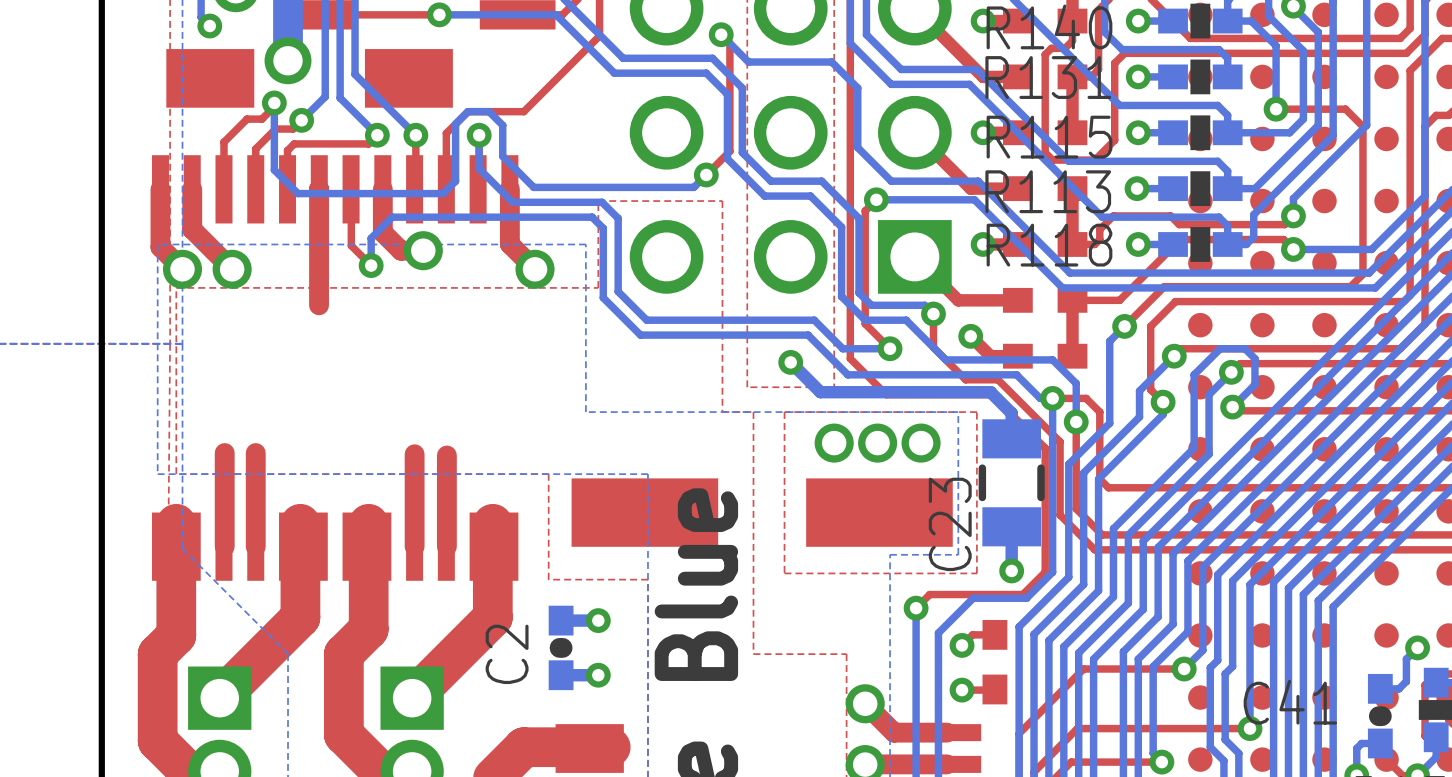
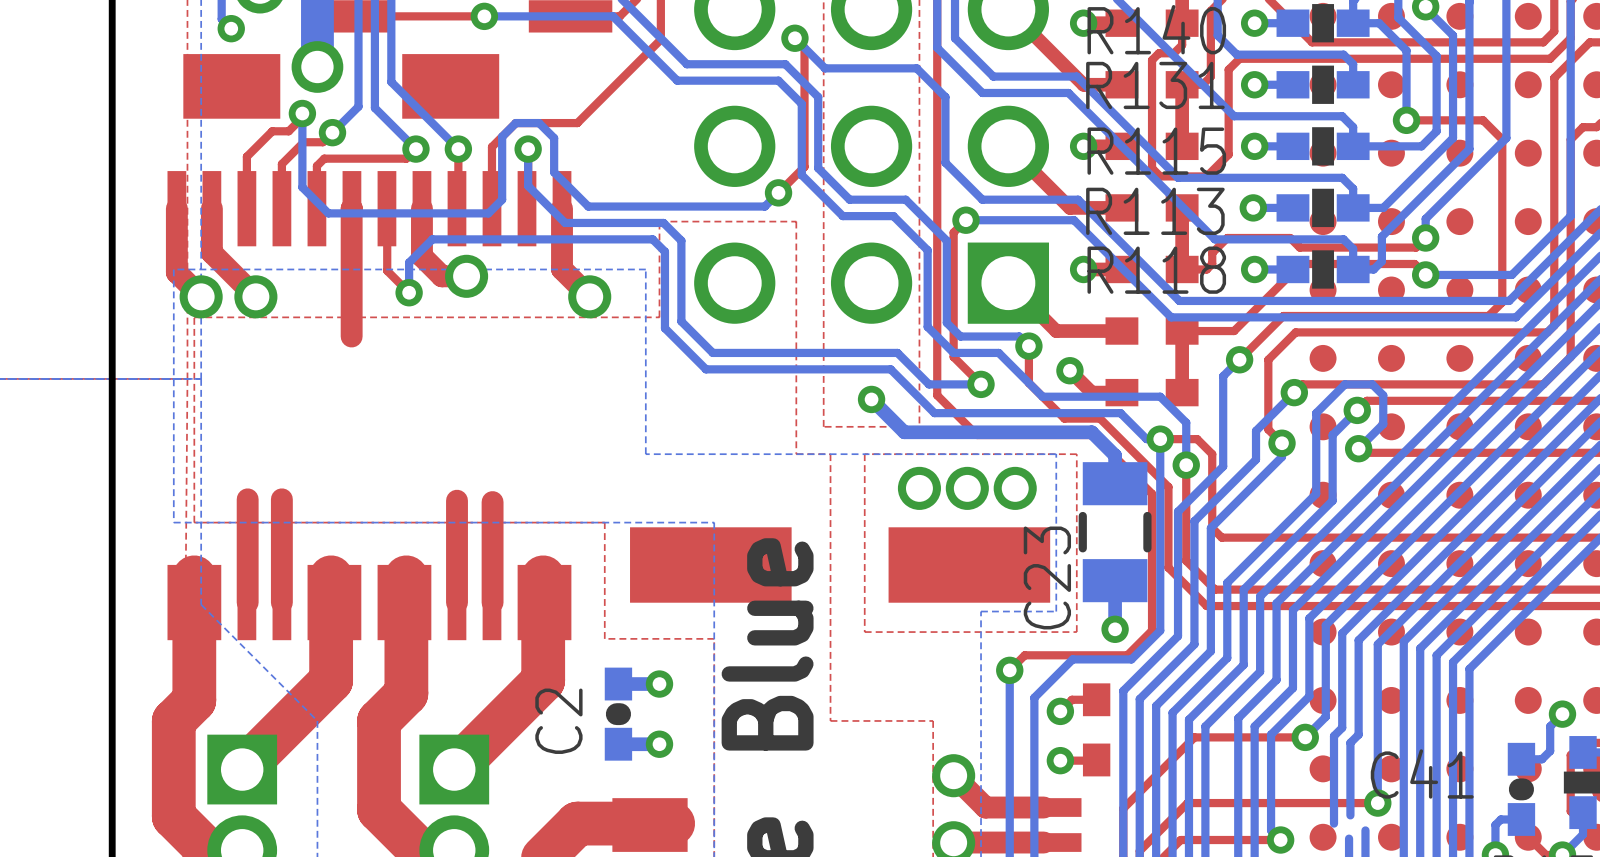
bottom track: (1225, 739) (1238, 753) -> none
bottom track: (1210, 747) (1223, 760) -> none

